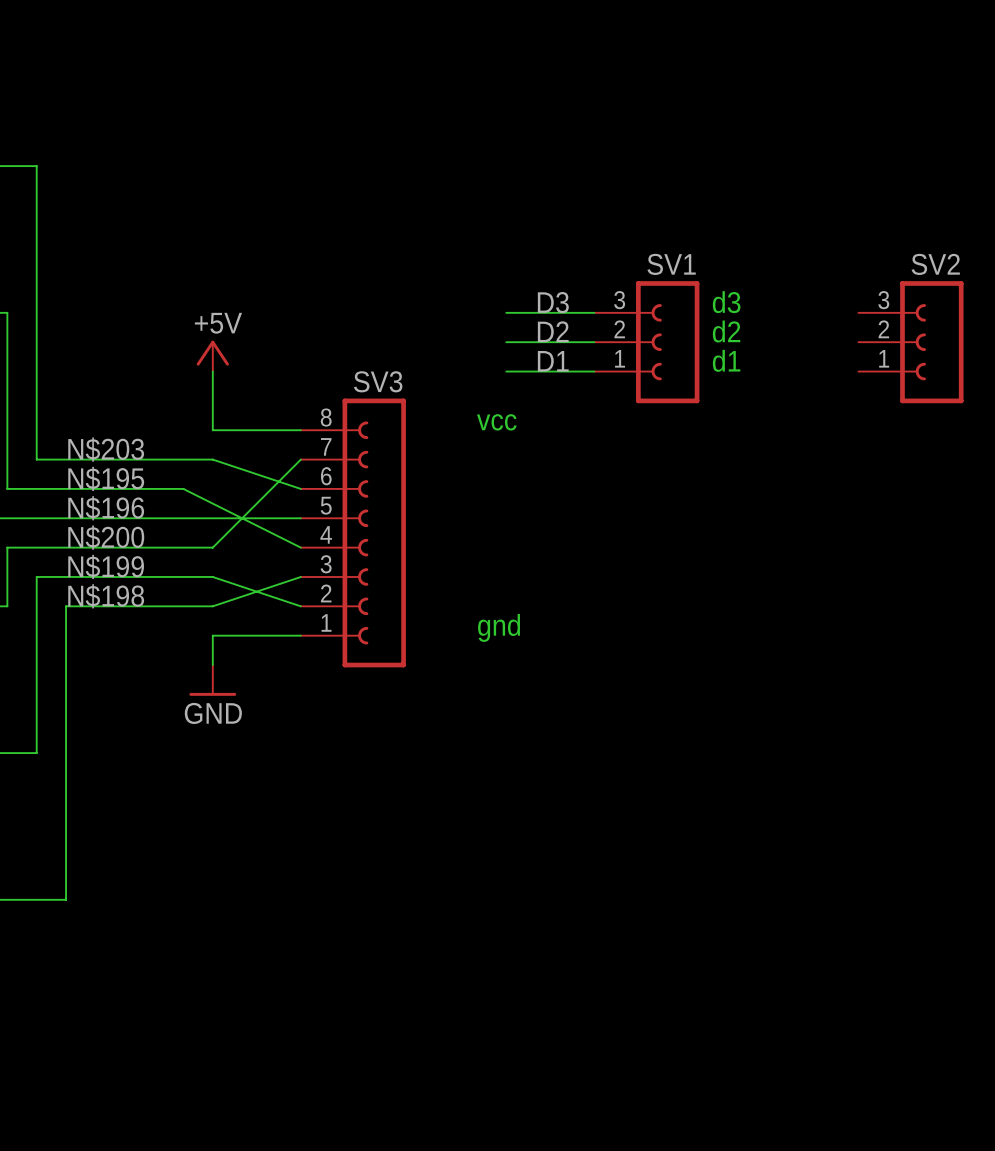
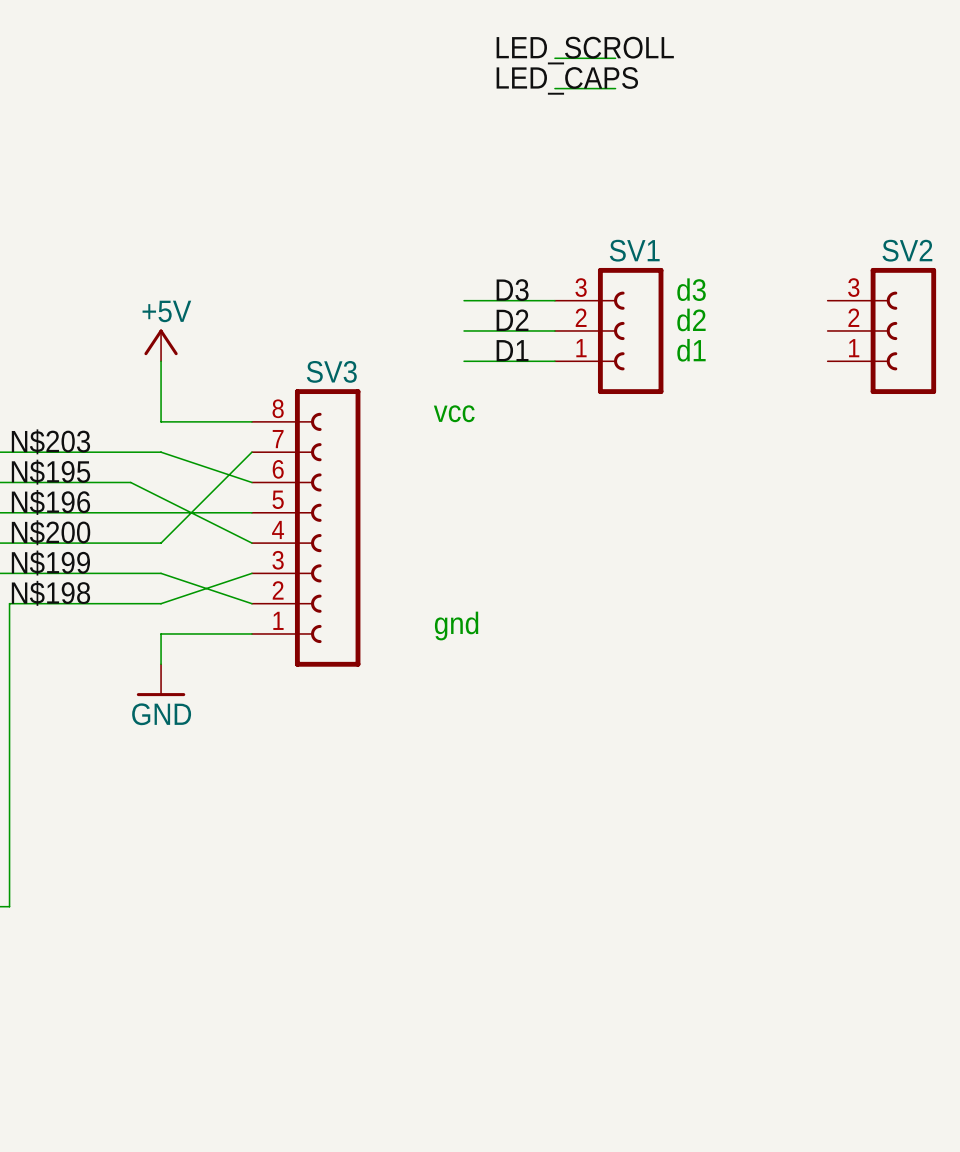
label: none -> LED_SCROLL (585, 50)
wire: none -> (554, 58) (615, 58)
label: none -> LED_CAPS (567, 80)
wire: none -> (554, 88) (615, 88)

